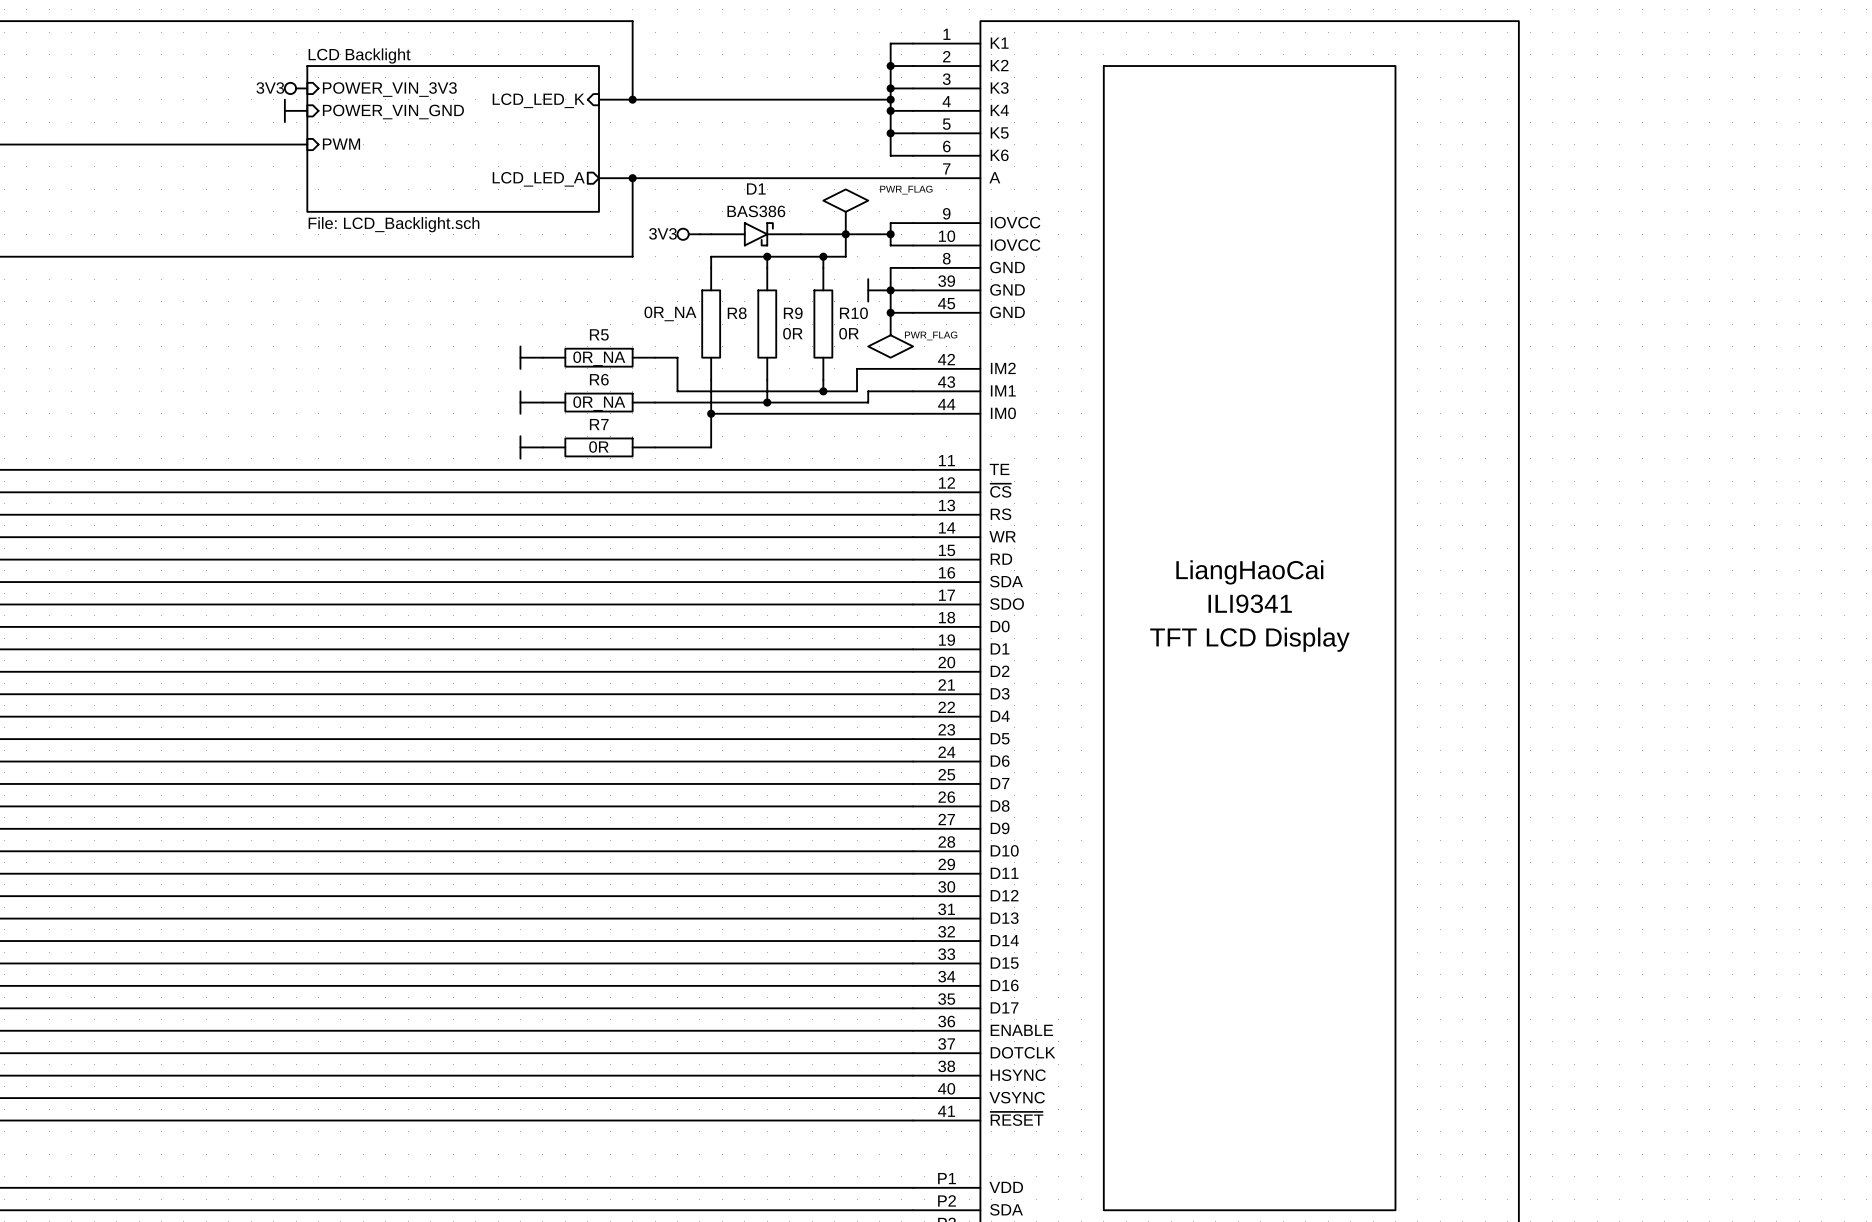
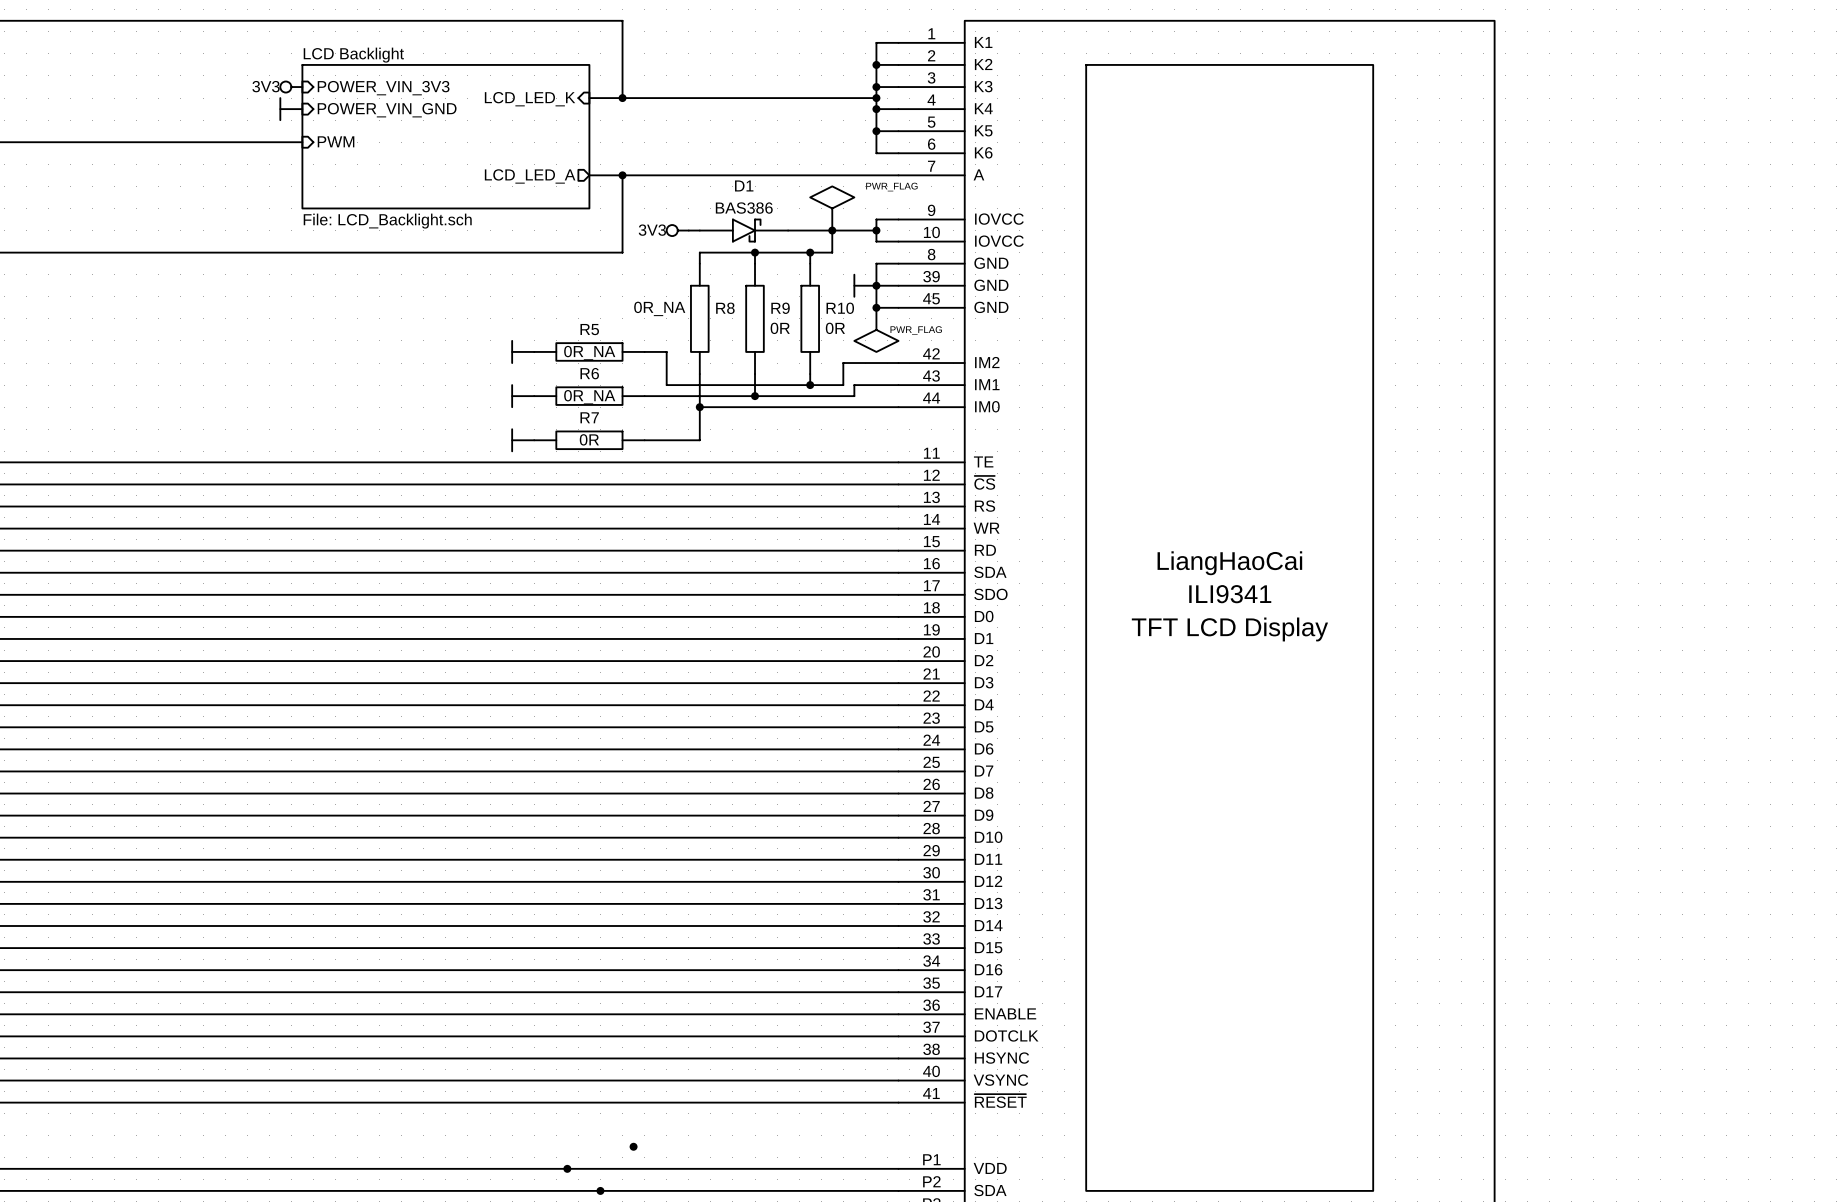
junction: none -> (633, 1146)
junction: none -> (567, 1168)
junction: none -> (600, 1190)

